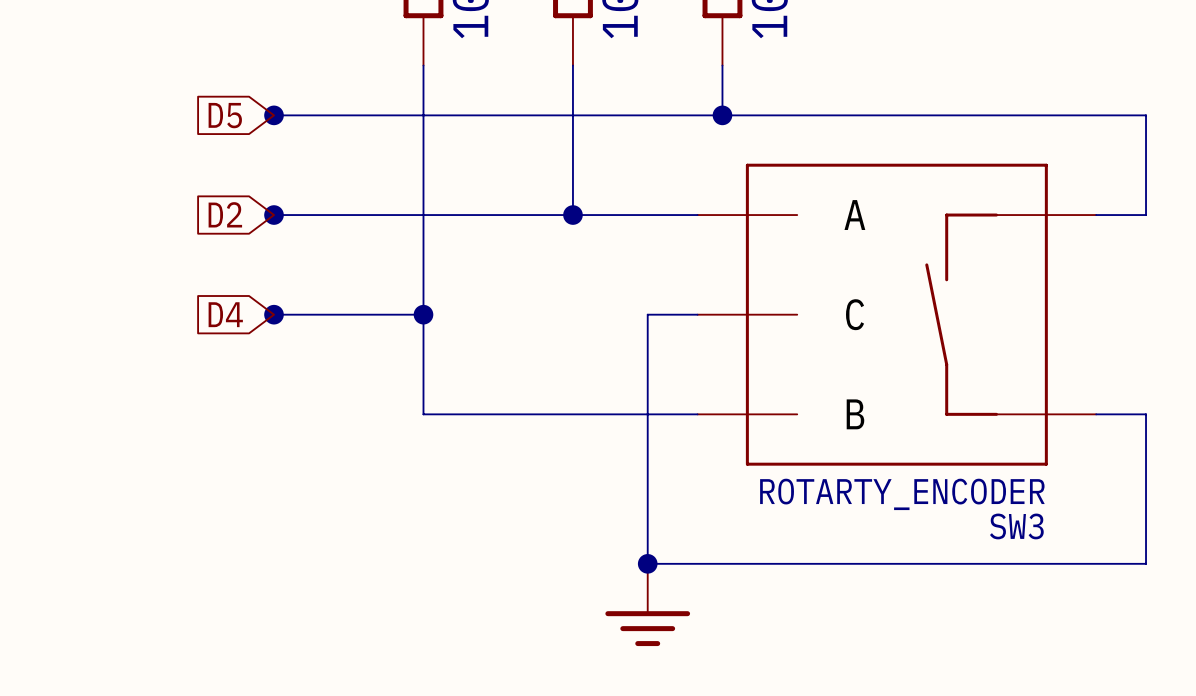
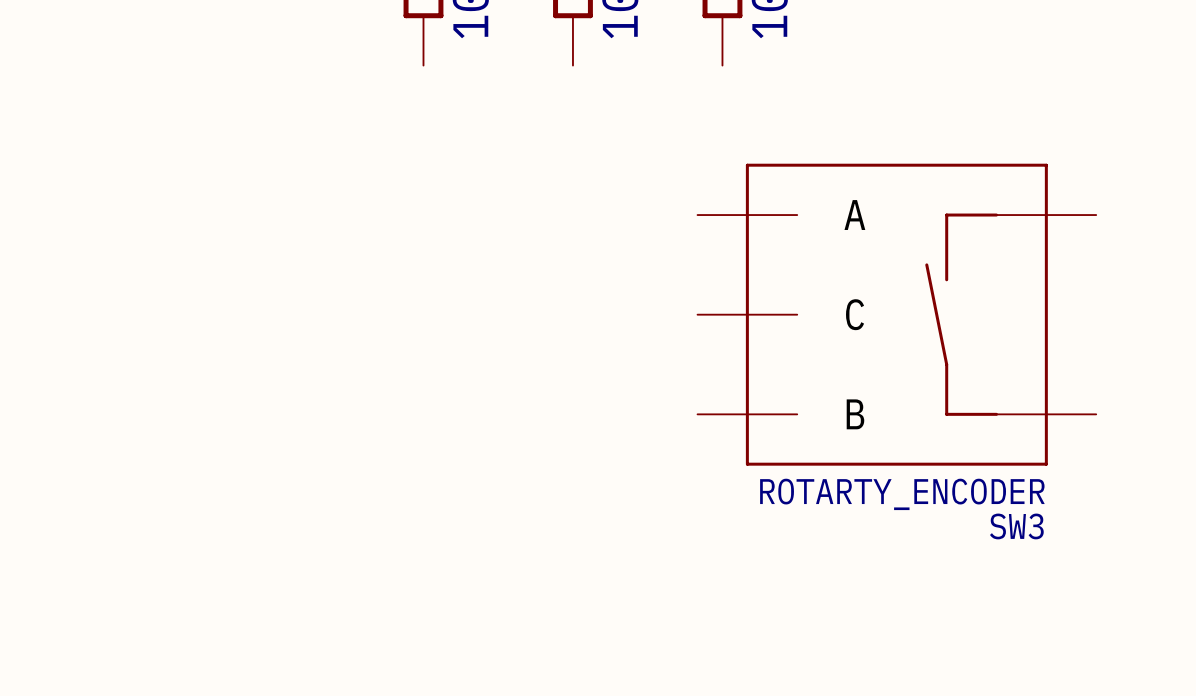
wire: (423, 65) (423, 414) (697, 414) -> none
wire: (572, 65) (572, 215) -> none
wire: (722, 65) (722, 115) -> none
global label: D5 (225, 115) -> none
wire: (274, 115) (1146, 115) (1146, 215) (1096, 215) -> none
junction: (274, 115) -> none
junction: (722, 115) -> none
global label: D2 (225, 214) -> none
wire: (274, 215) (697, 215) -> none
junction: (274, 215) -> none
junction: (572, 215) -> none
global label: D4 (225, 314) -> none
wire: (274, 314) (423, 314) -> none
junction: (274, 314) -> none
junction: (423, 314) -> none
wire: (697, 314) (647, 314) (647, 563) (1146, 563) (1146, 414) (1096, 414) -> none
junction: (647, 563) -> none
power symbol: (647, 604) -> none

